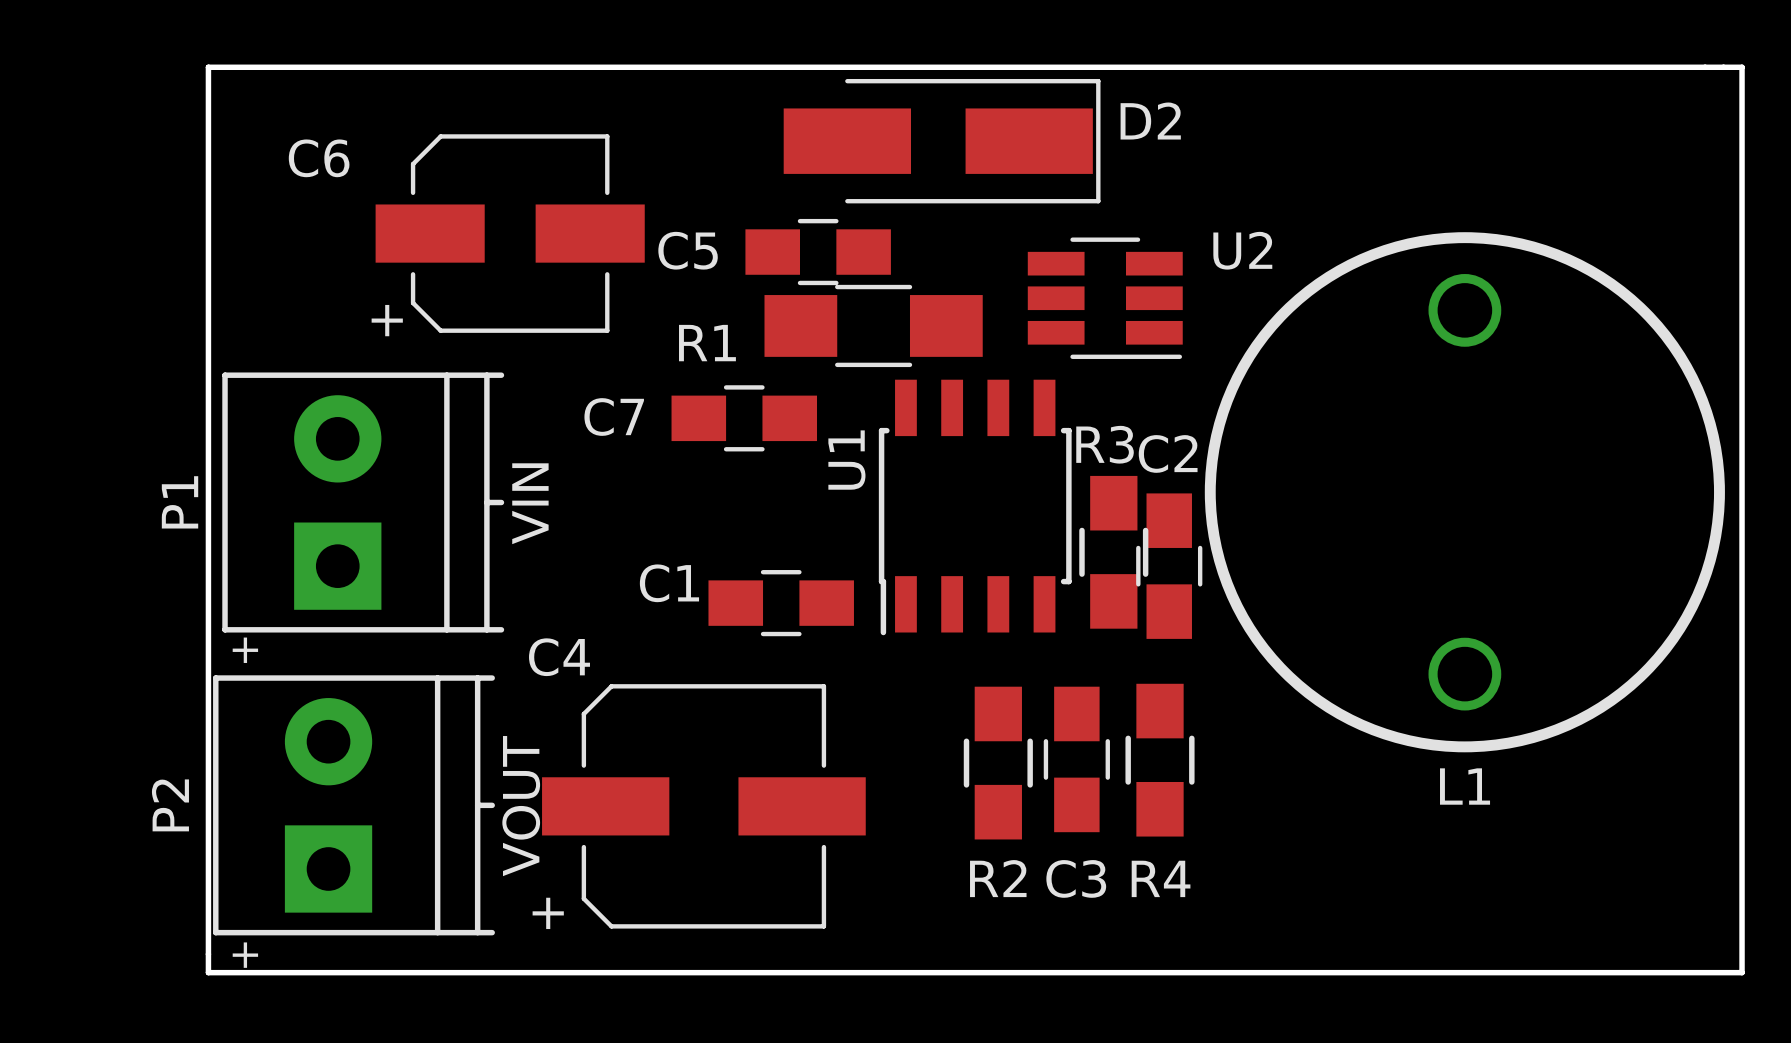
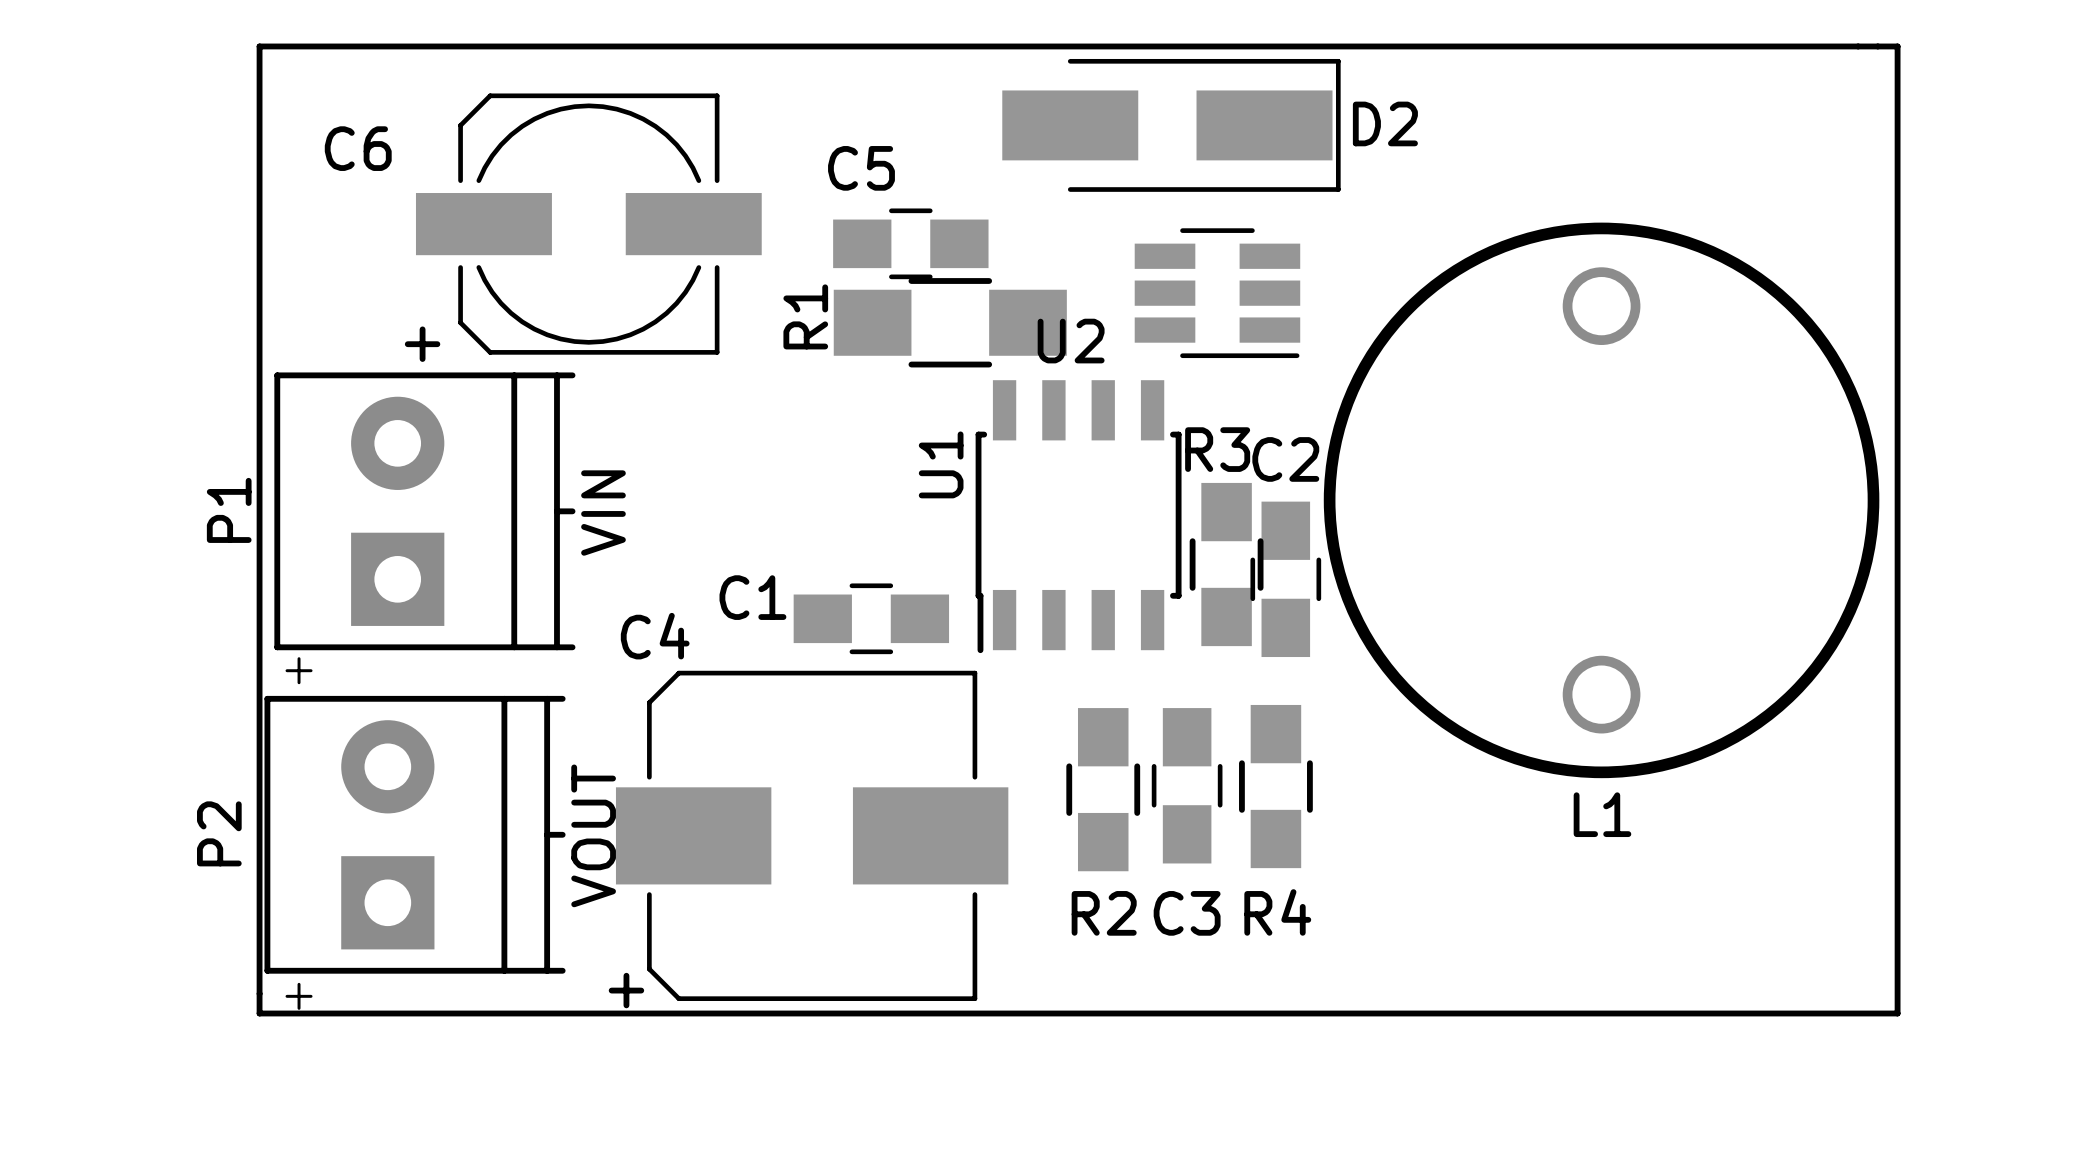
D2 name position: D2 (1150, 121) -> D2 (1385, 123)
C6 footprint: [375, 134, 645, 333] -> [415, 93, 762, 355]
D2 position: (942, 141) -> (1171, 125)
C5 name position: C5 (688, 250) -> C5 (861, 168)
U2 name position: U2 (1242, 250) -> U2 (1071, 341)
R1 footprint: [764, 284, 983, 368] -> [833, 278, 1067, 368]
R1 name rotation: 0° (707, 343) -> 90° counterclockwise (805, 316)
C7: (744, 418) -> none
C4 footprint: [542, 684, 866, 929] -> [615, 670, 1009, 1001]

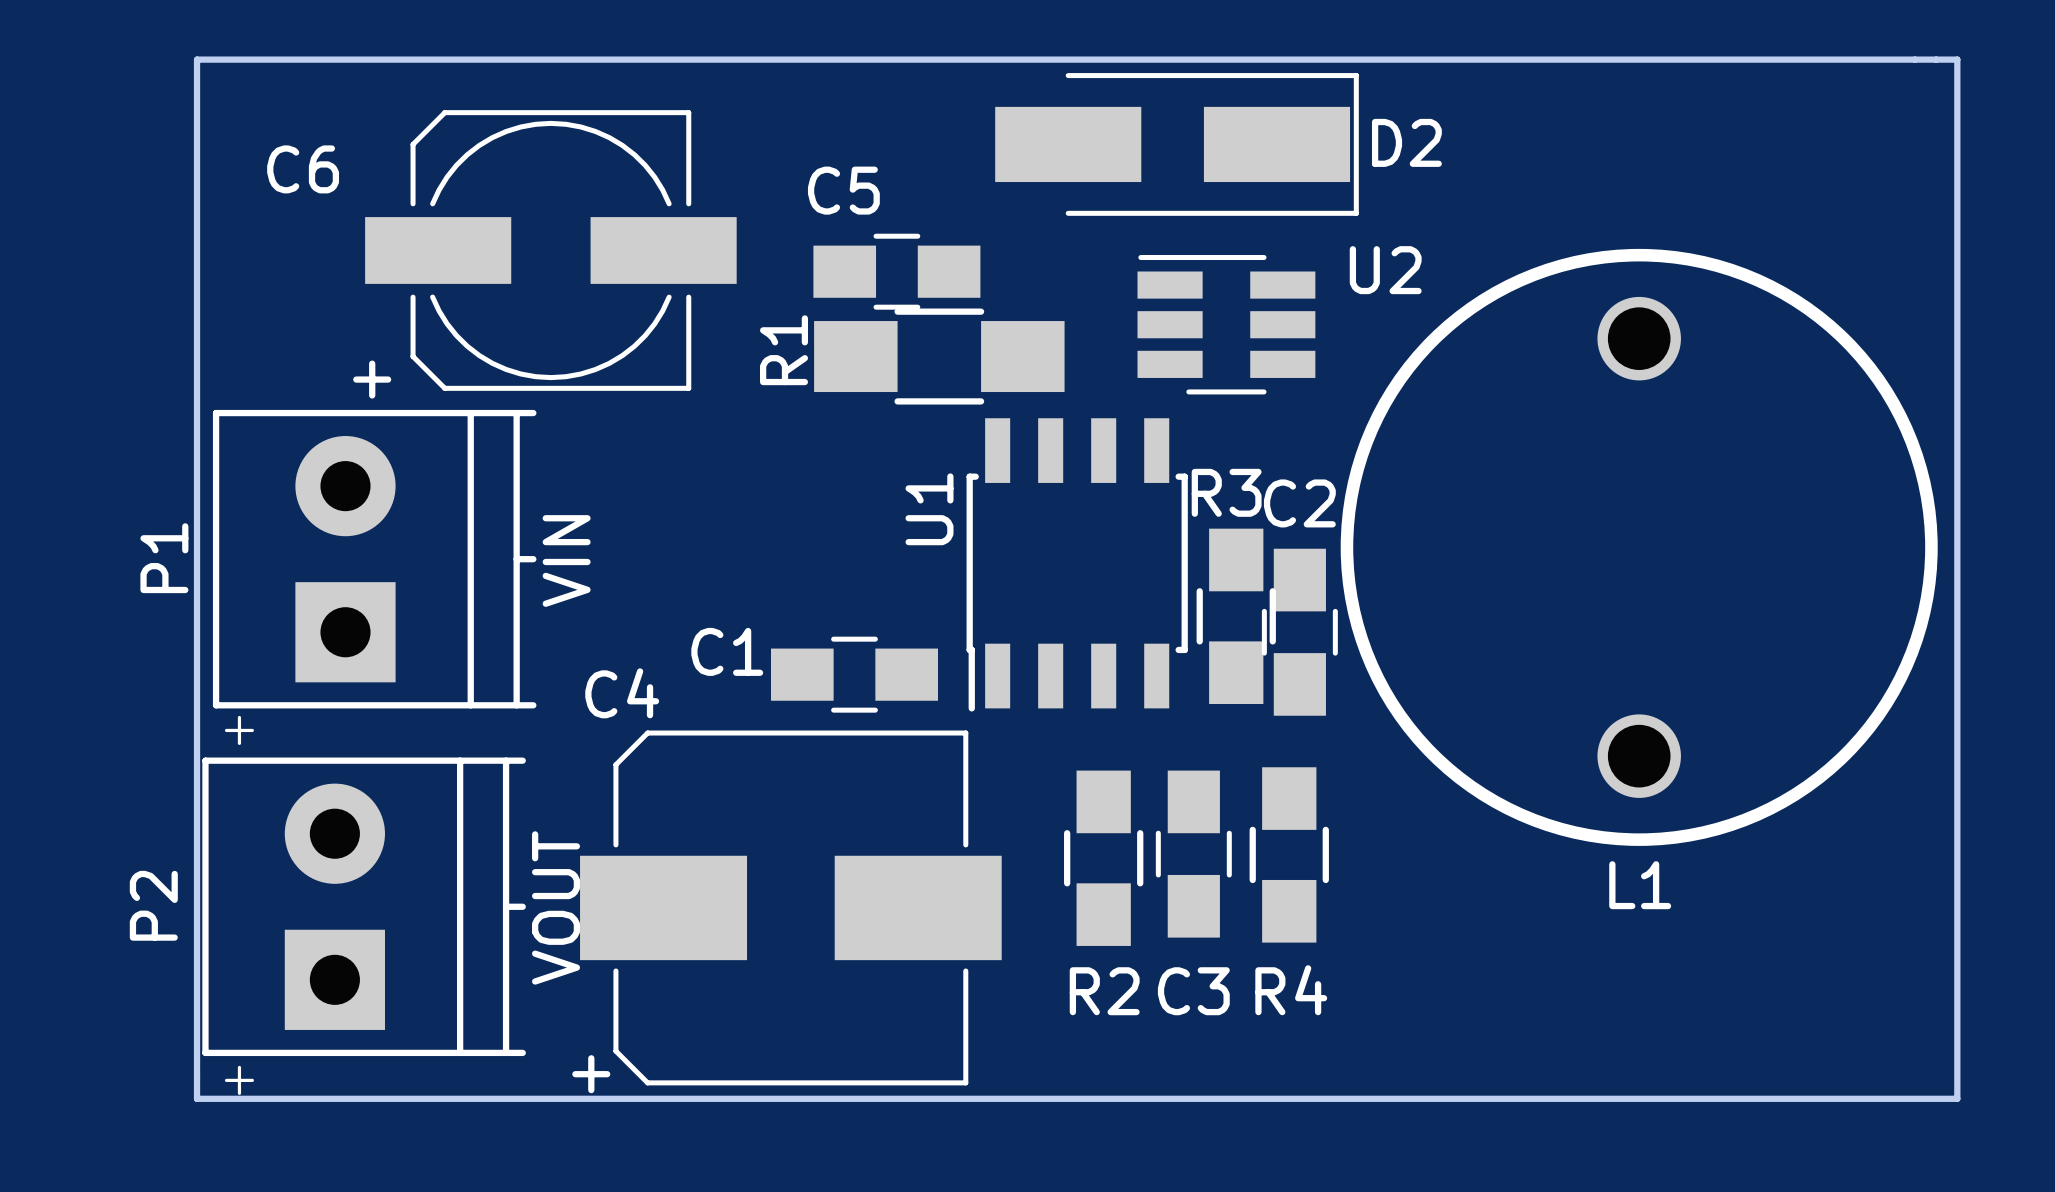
U2 rotation: 0° (1217, 293) -> 180° (1226, 324)

